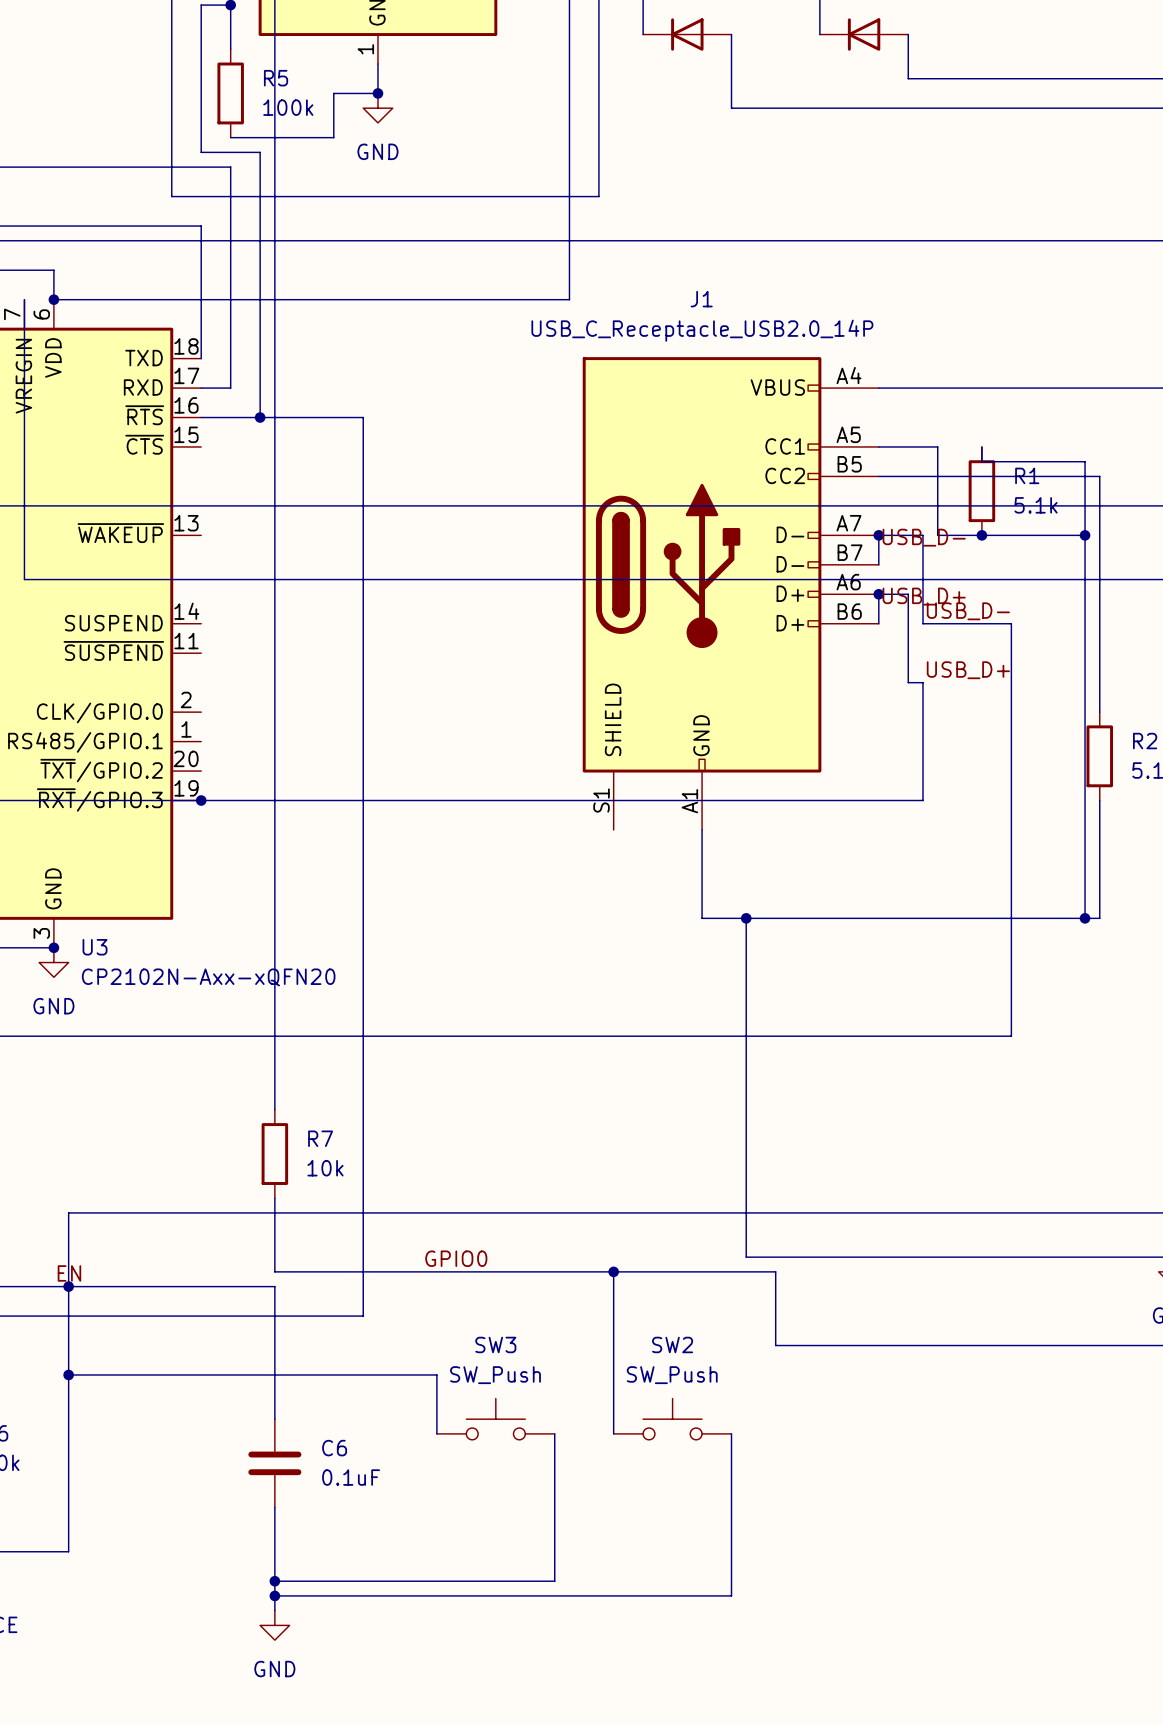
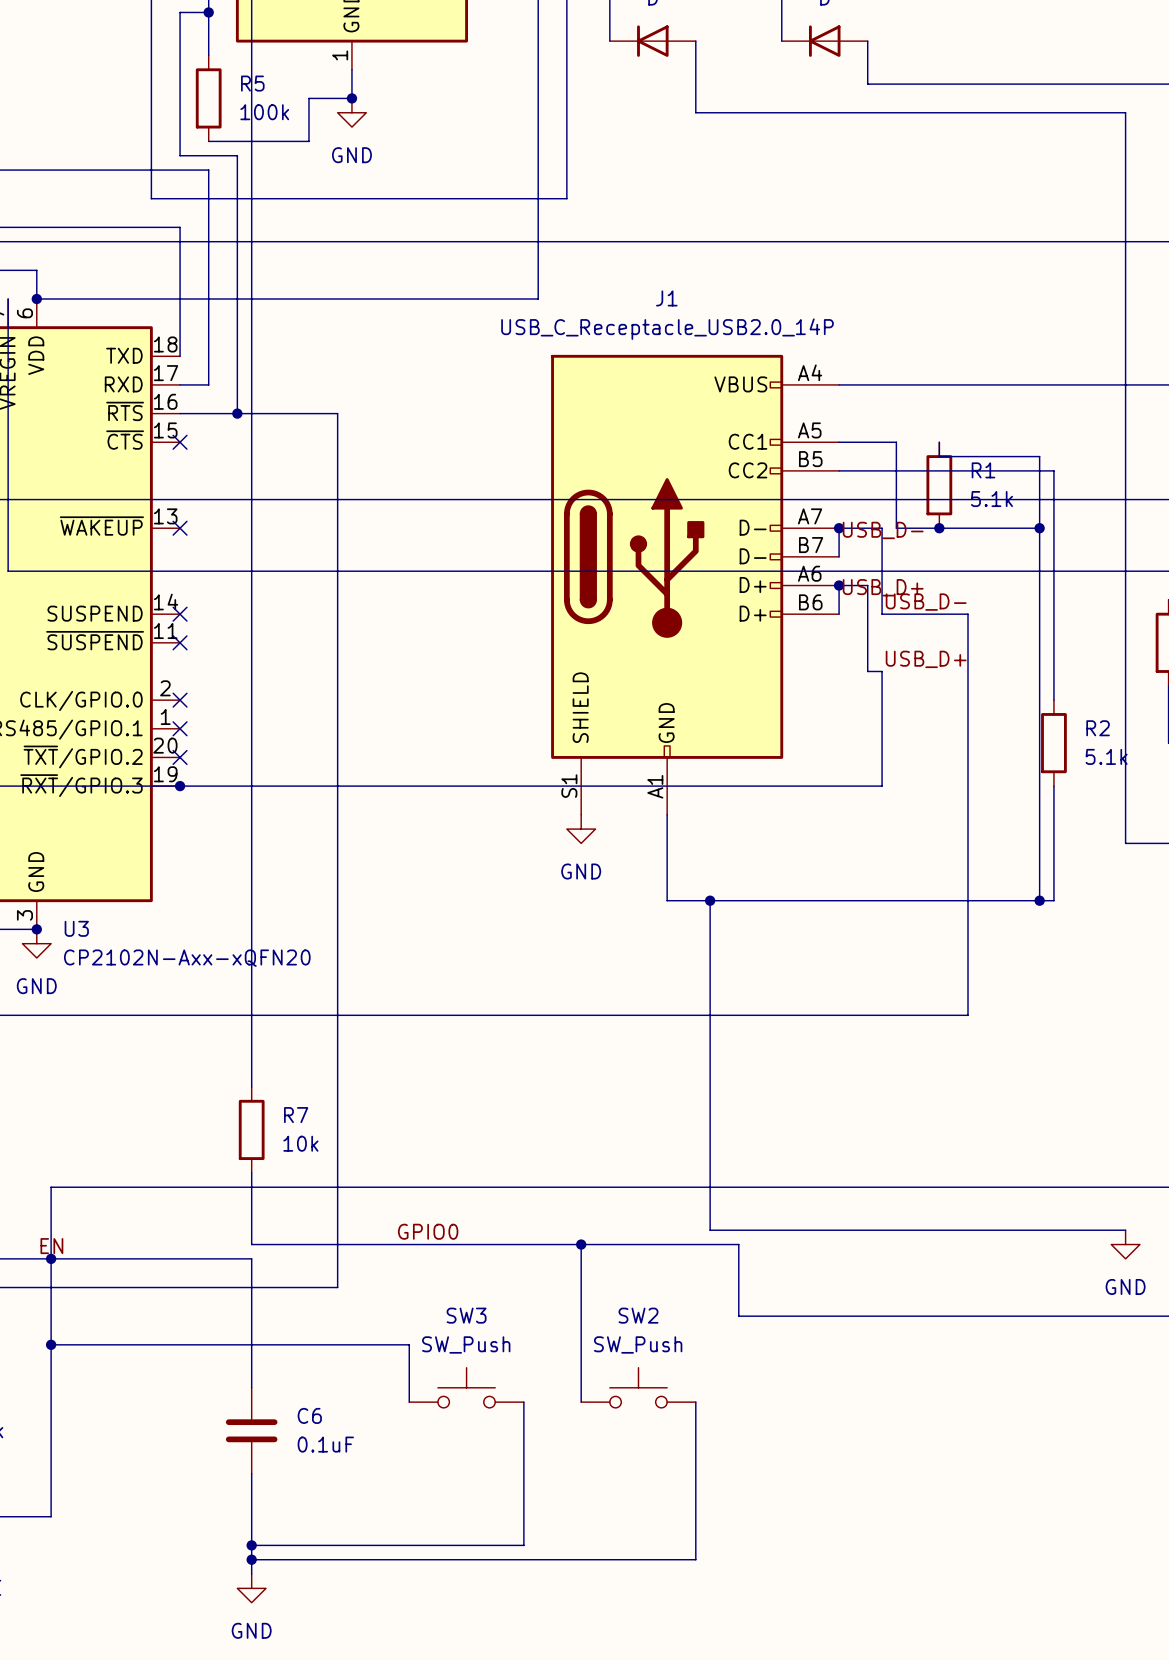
no-connect mark: none -> (180, 442)
no-connect mark: none -> (180, 528)
no-connect mark: none -> (180, 614)
no-connect mark: none -> (180, 642)
no-connect mark: none -> (180, 700)
no-connect mark: none -> (180, 728)
no-connect mark: none -> (180, 757)
power symbol: none -> GND (581, 829)

